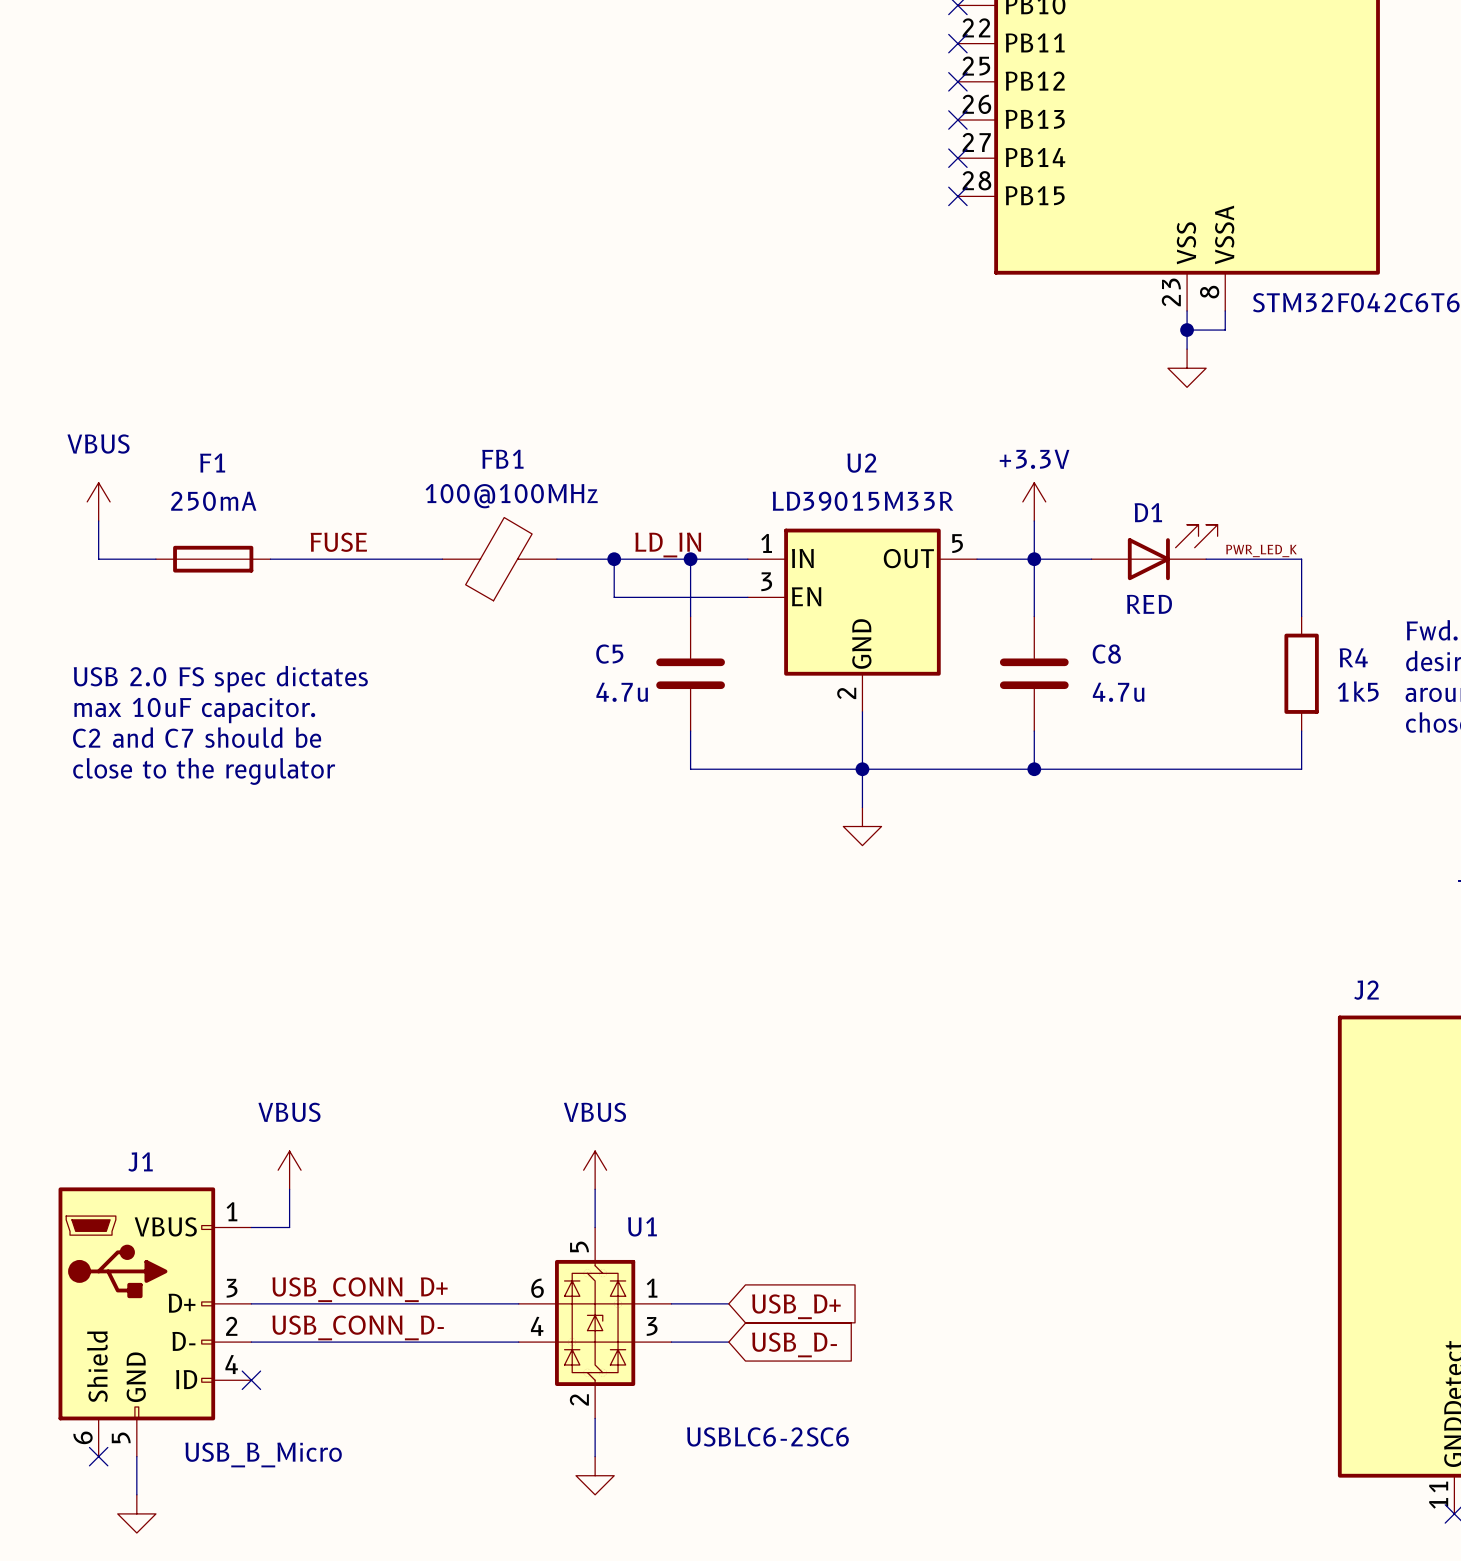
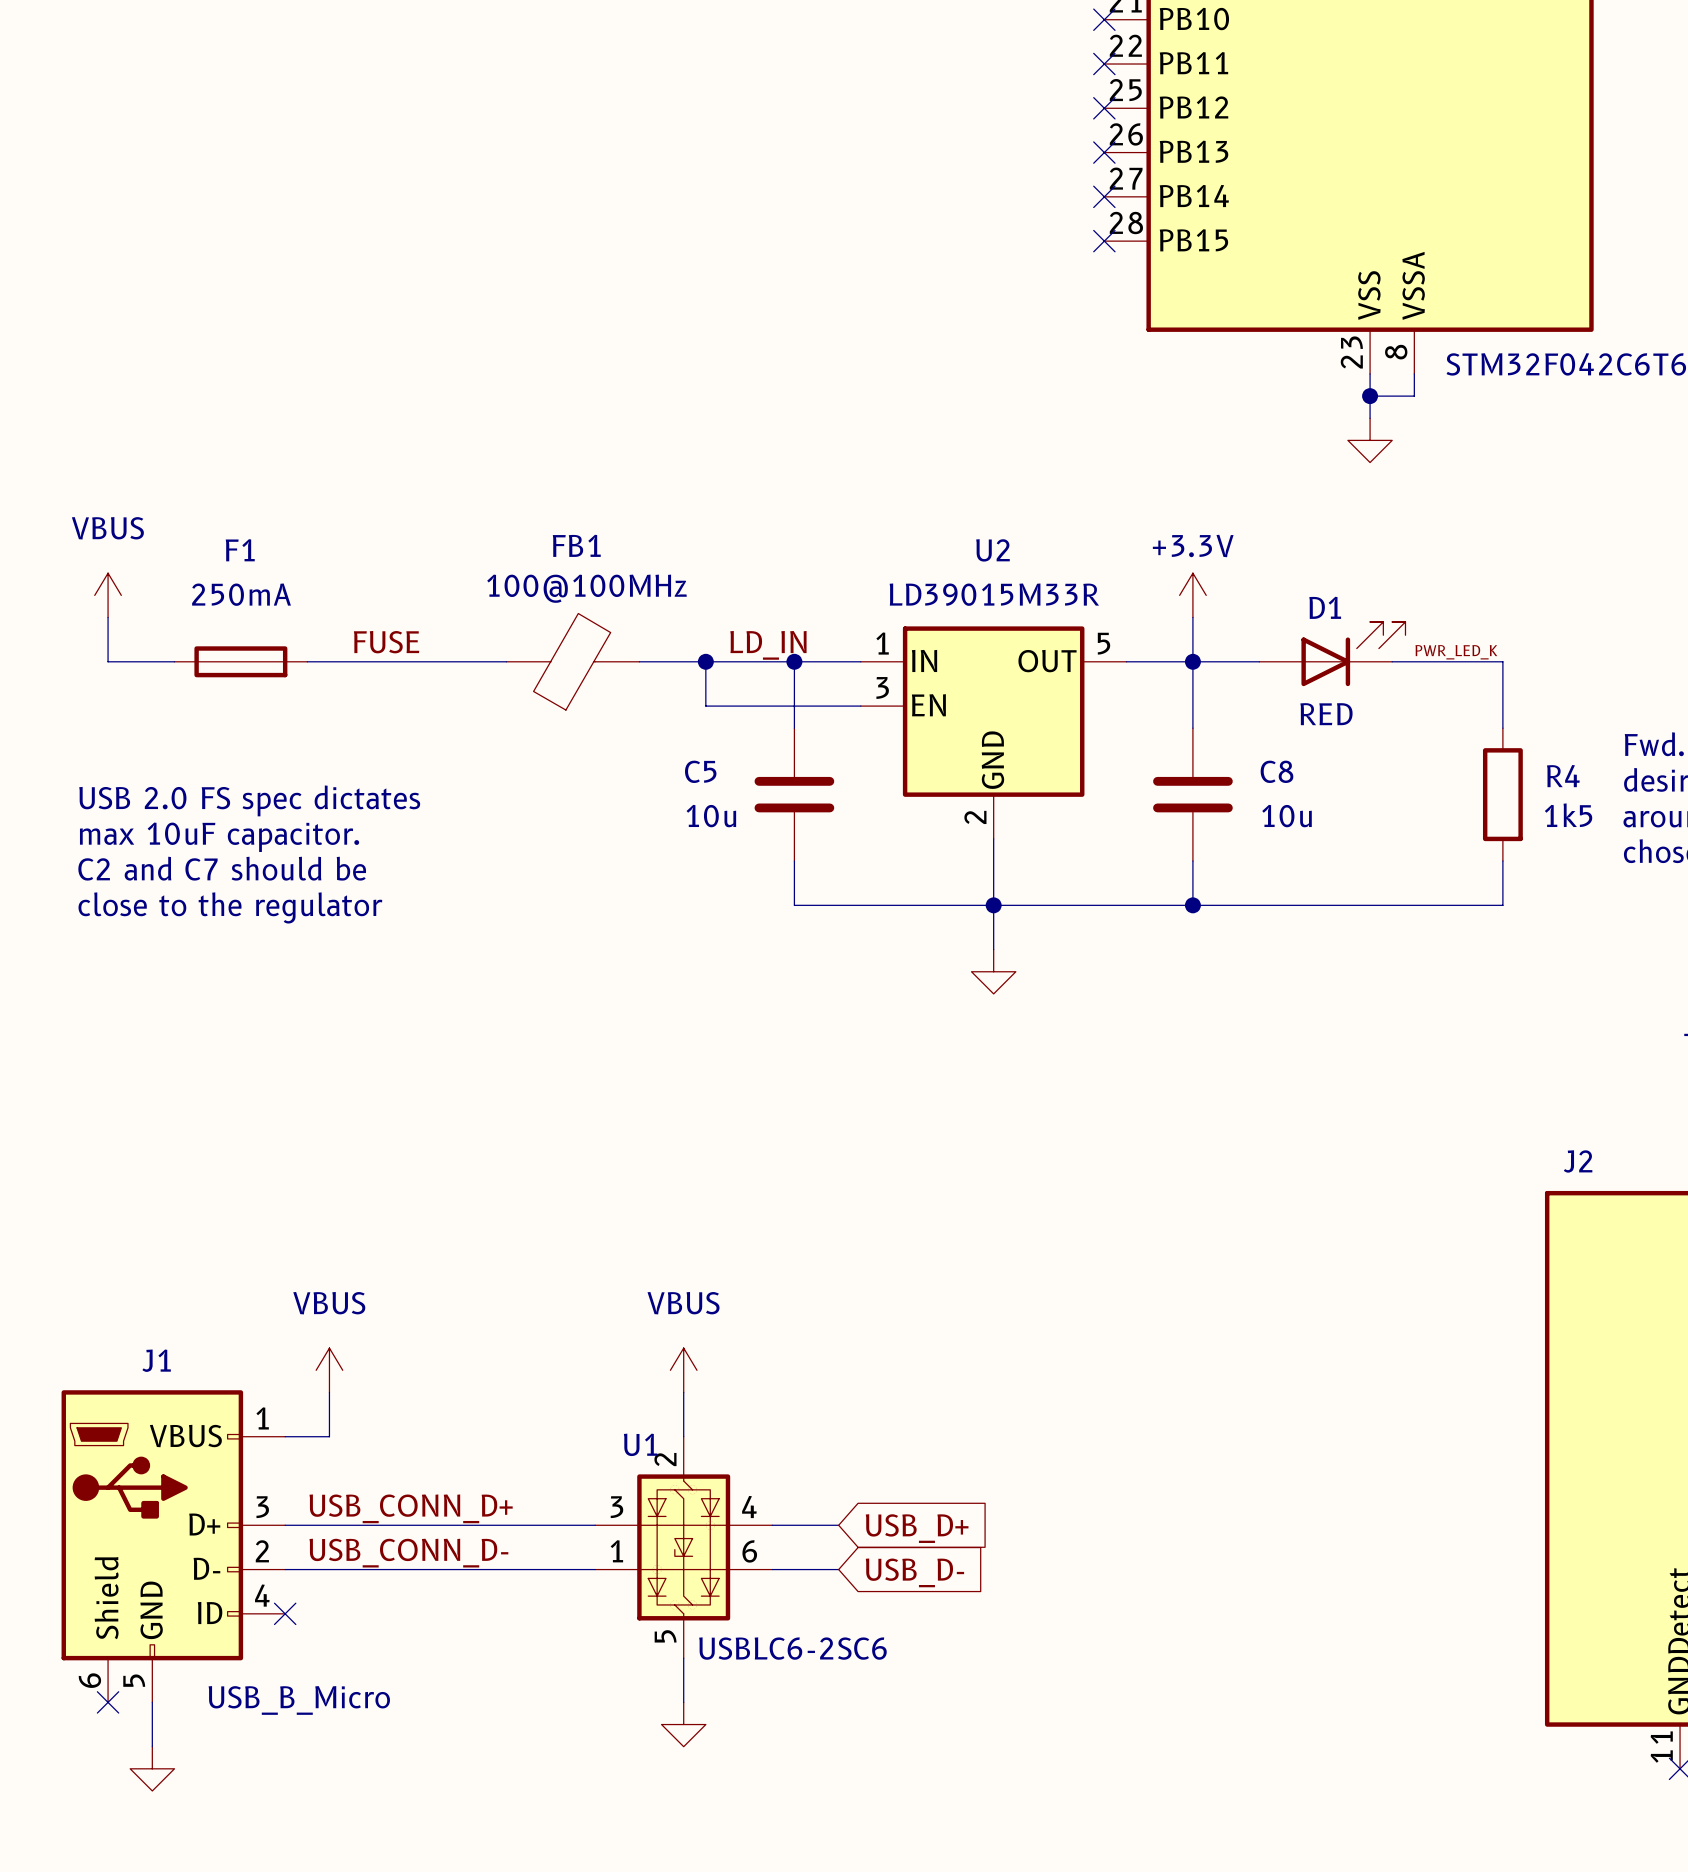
C5 value: 4.7u (622, 692) -> 10u (711, 816)
C8 value: 4.7u (1118, 692) -> 10u (1287, 816)
U1 name position: U1 (642, 1226) -> U1 (640, 1444)
U1 rotation: 0° (595, 1322) -> 180° (683, 1547)
U1 value position: USBLC6-2SC6 (767, 1436) -> USBLC6-2SC6 (792, 1648)

